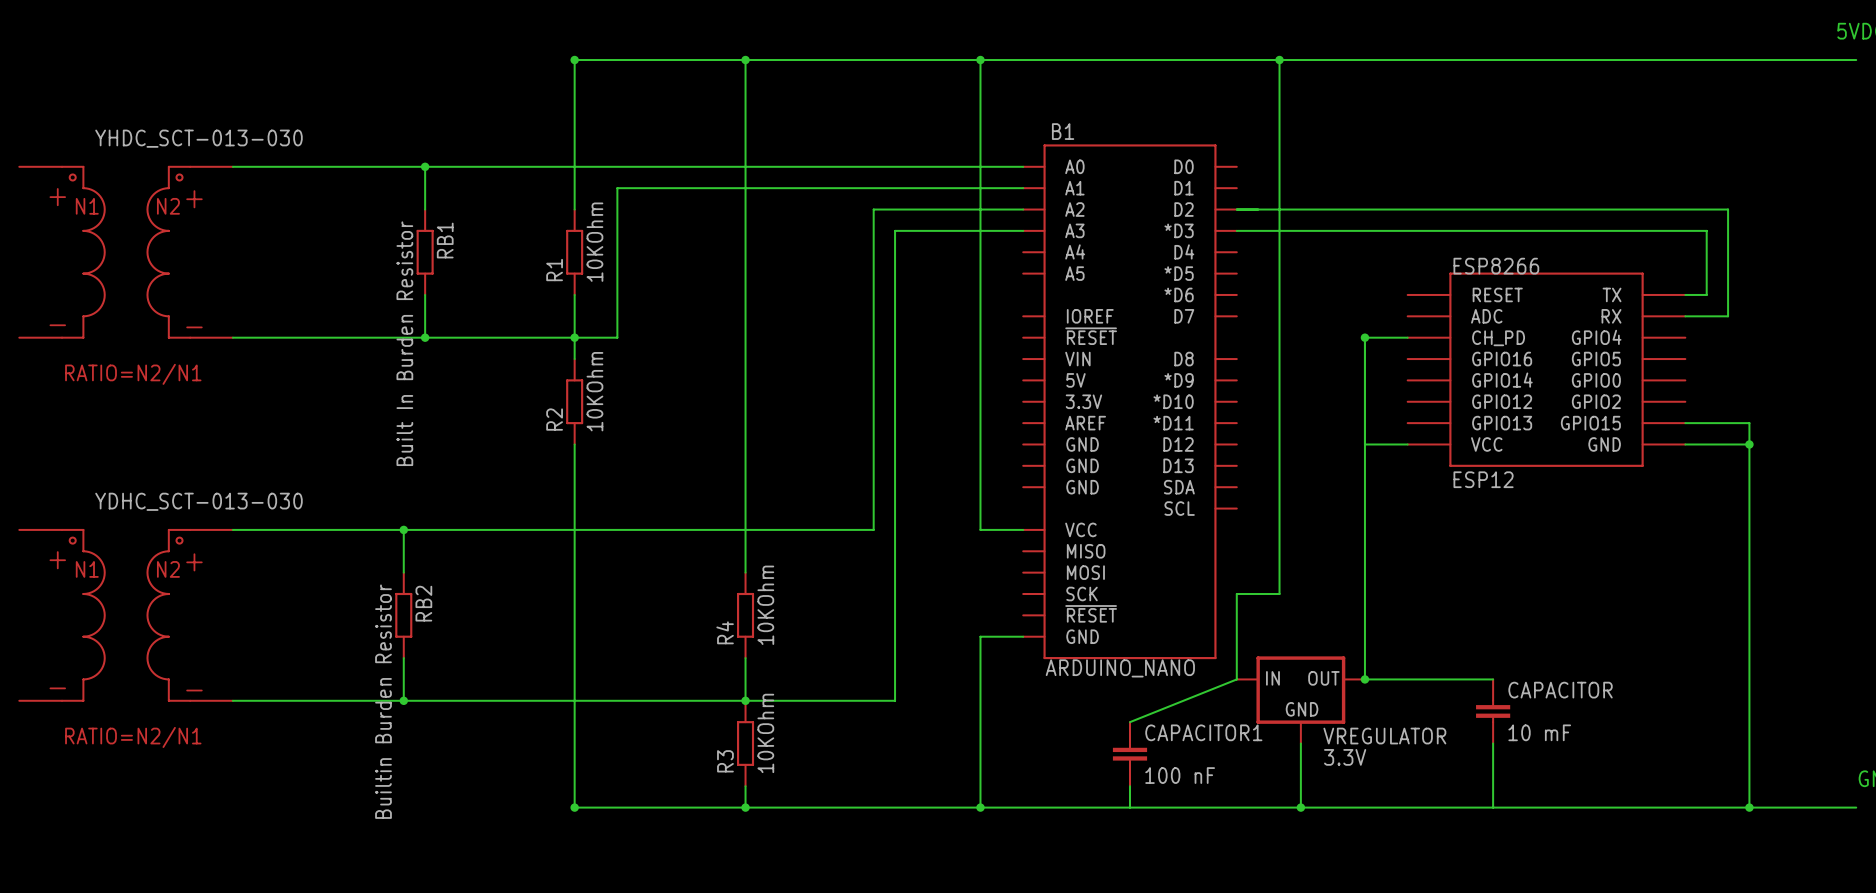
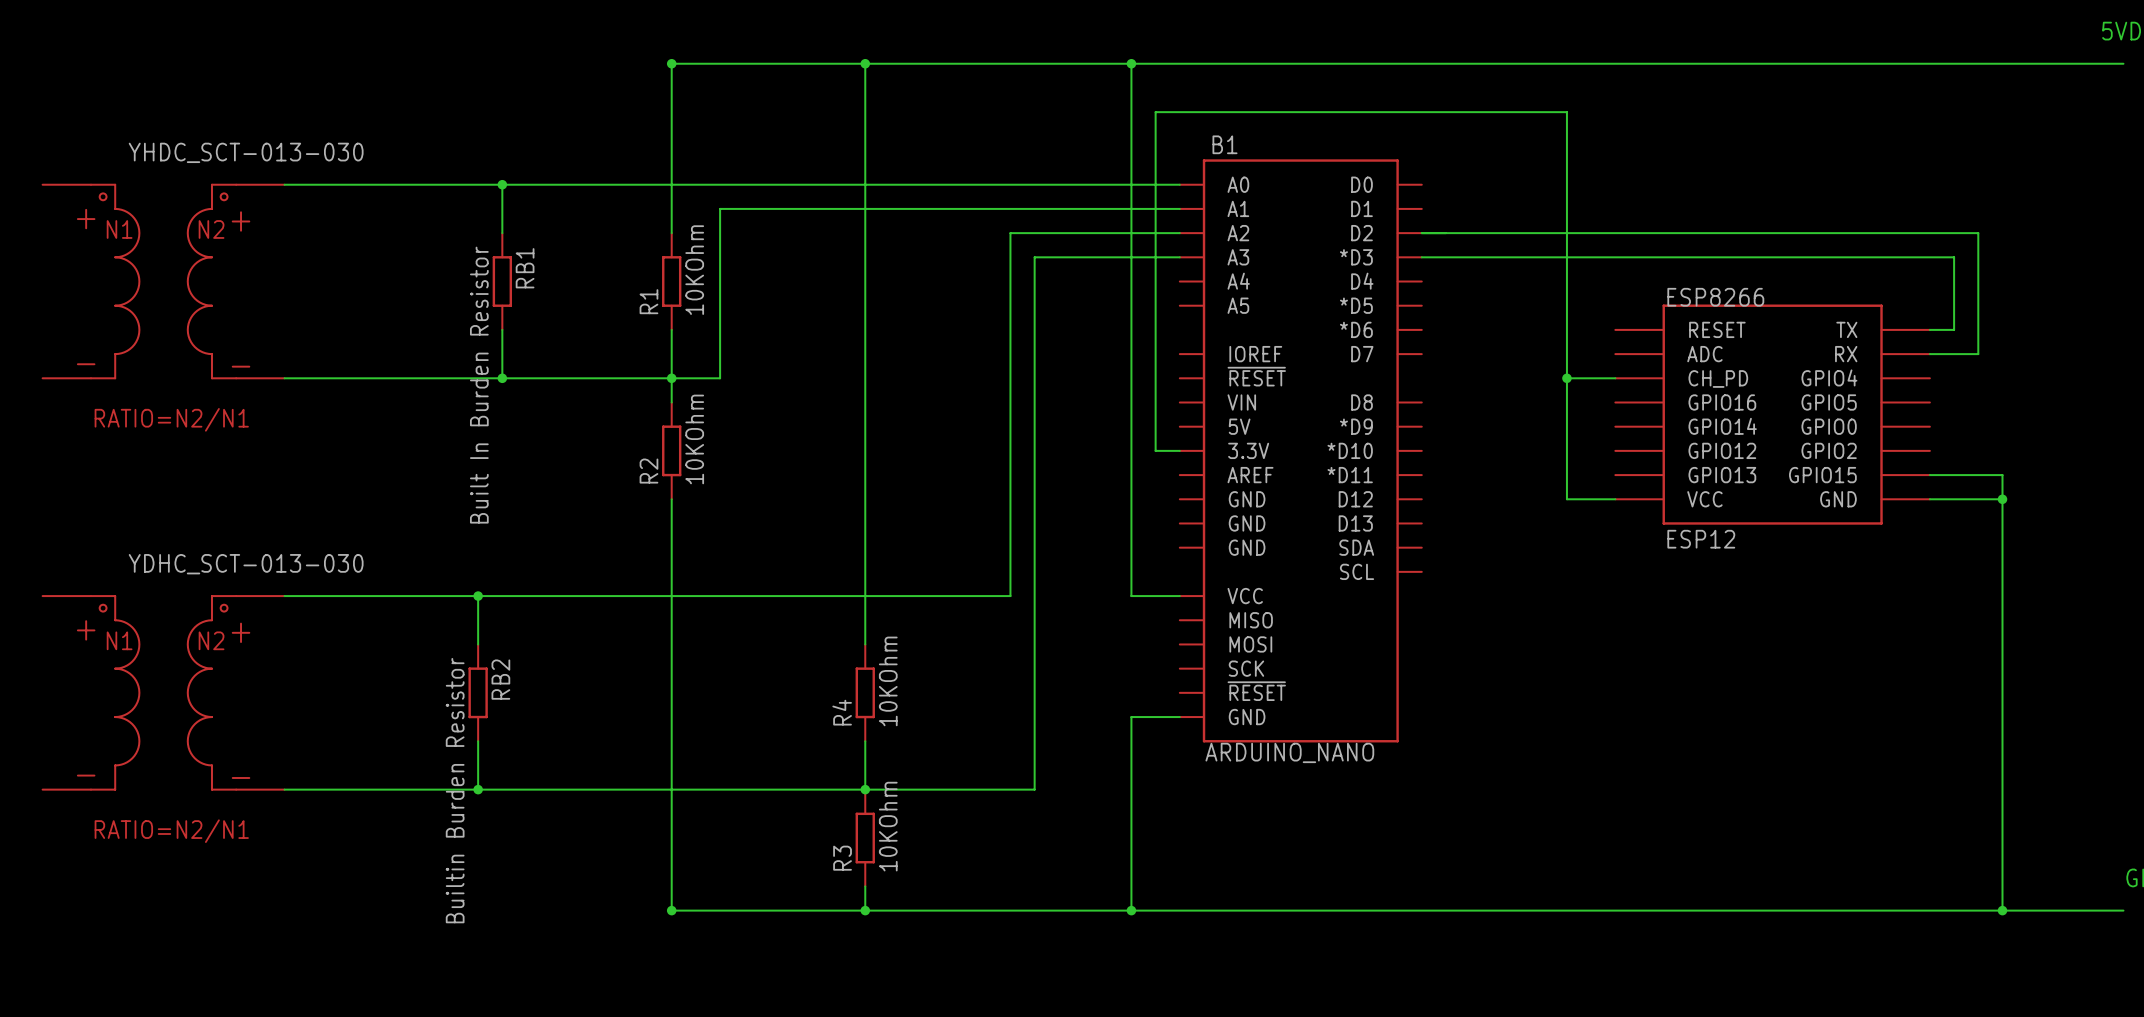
wire: (1279, 60) (1279, 593) (1236, 593) (1236, 679) (1130, 722) -> none
junction: (1279, 60) -> none
wire: none -> (1566, 378) (1566, 112) (1155, 112) (1155, 450) (1179, 450)
wire: (1364, 444) (1364, 679) (1493, 679) -> none
junction: (1364, 679) -> none
VREGULATOR: 3.3V (1300, 699) -> none
CAPACITOR: 10 mF (1493, 711) -> none
wire: (1300, 743) (1300, 807) -> none
wire: (1493, 743) (1493, 807) -> none
CAPACITOR1: 100 nF (1130, 754) -> none
wire: (1130, 786) (1130, 807) -> none
junction: (1300, 807) -> none

